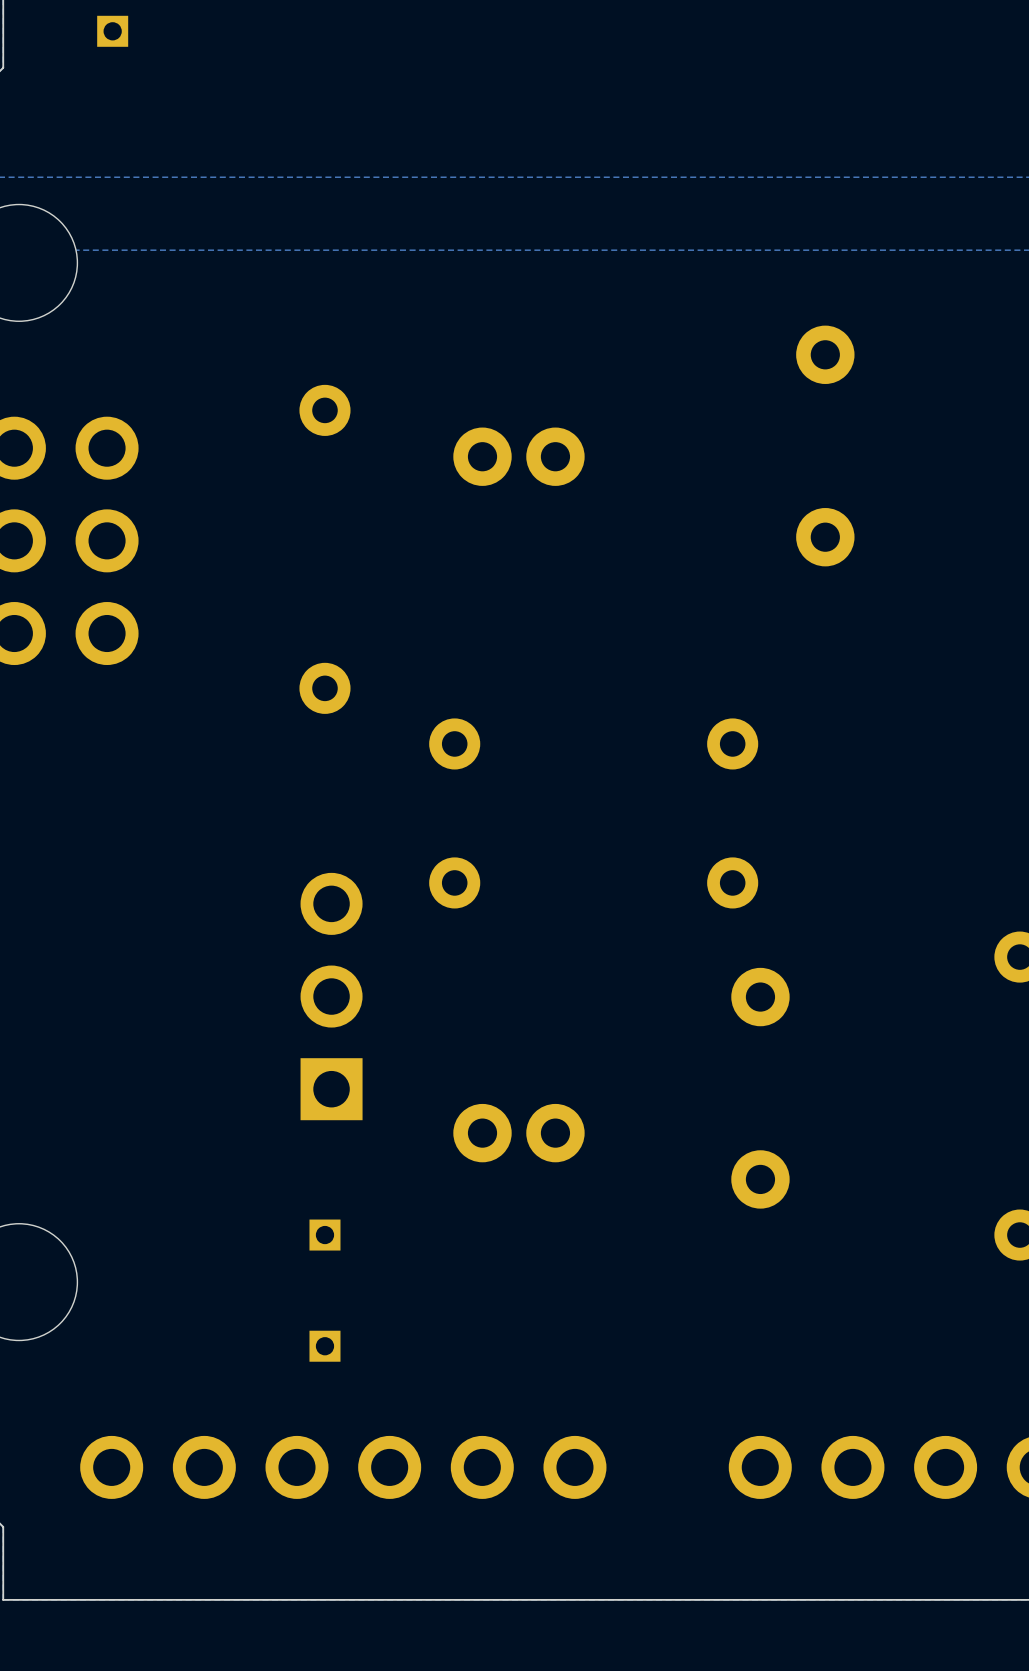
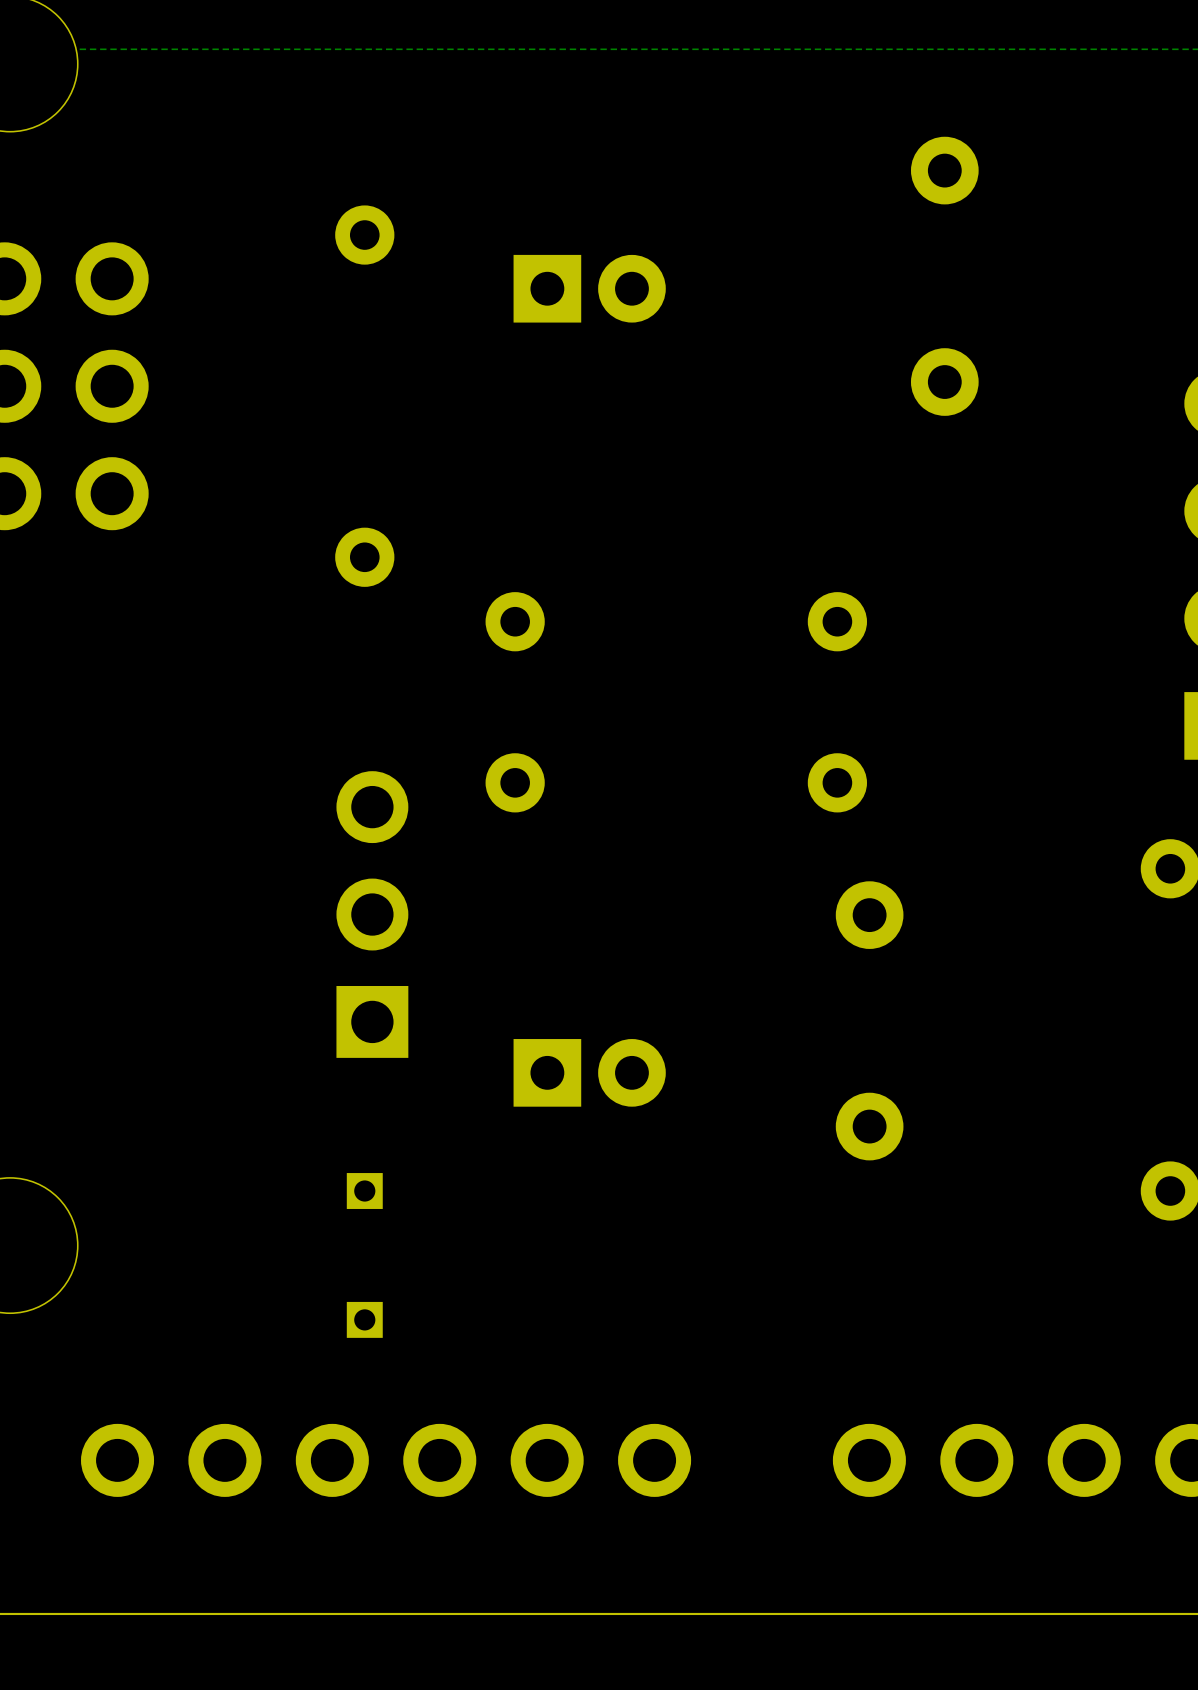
part footprint: [453, 427, 585, 486] -> [513, 254, 666, 323]
part footprint: [453, 1103, 585, 1163] -> [513, 1039, 666, 1107]

